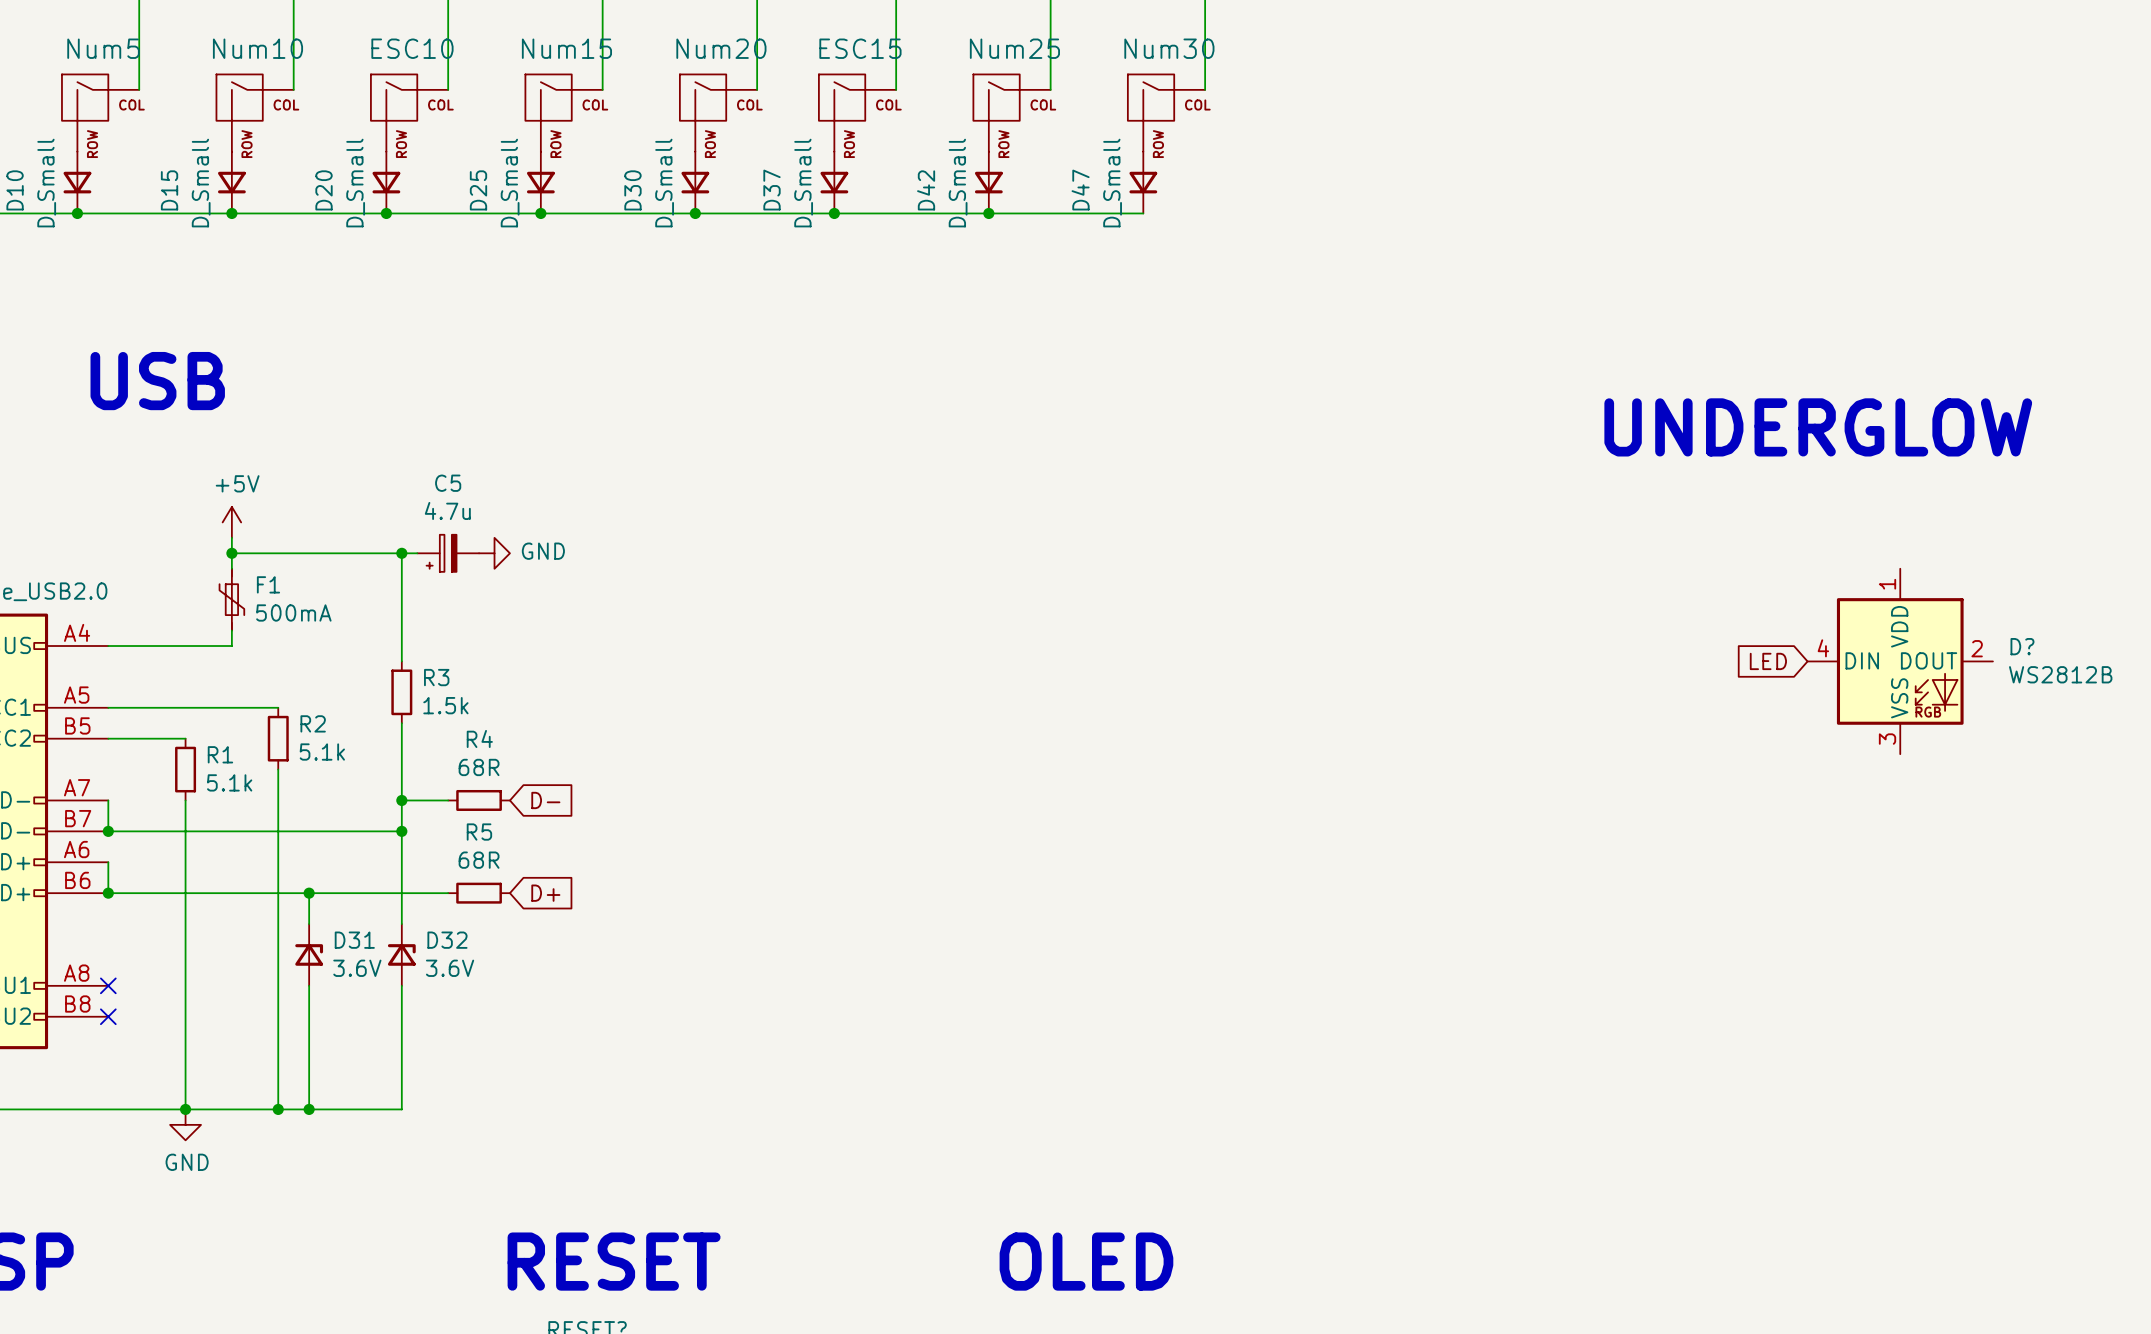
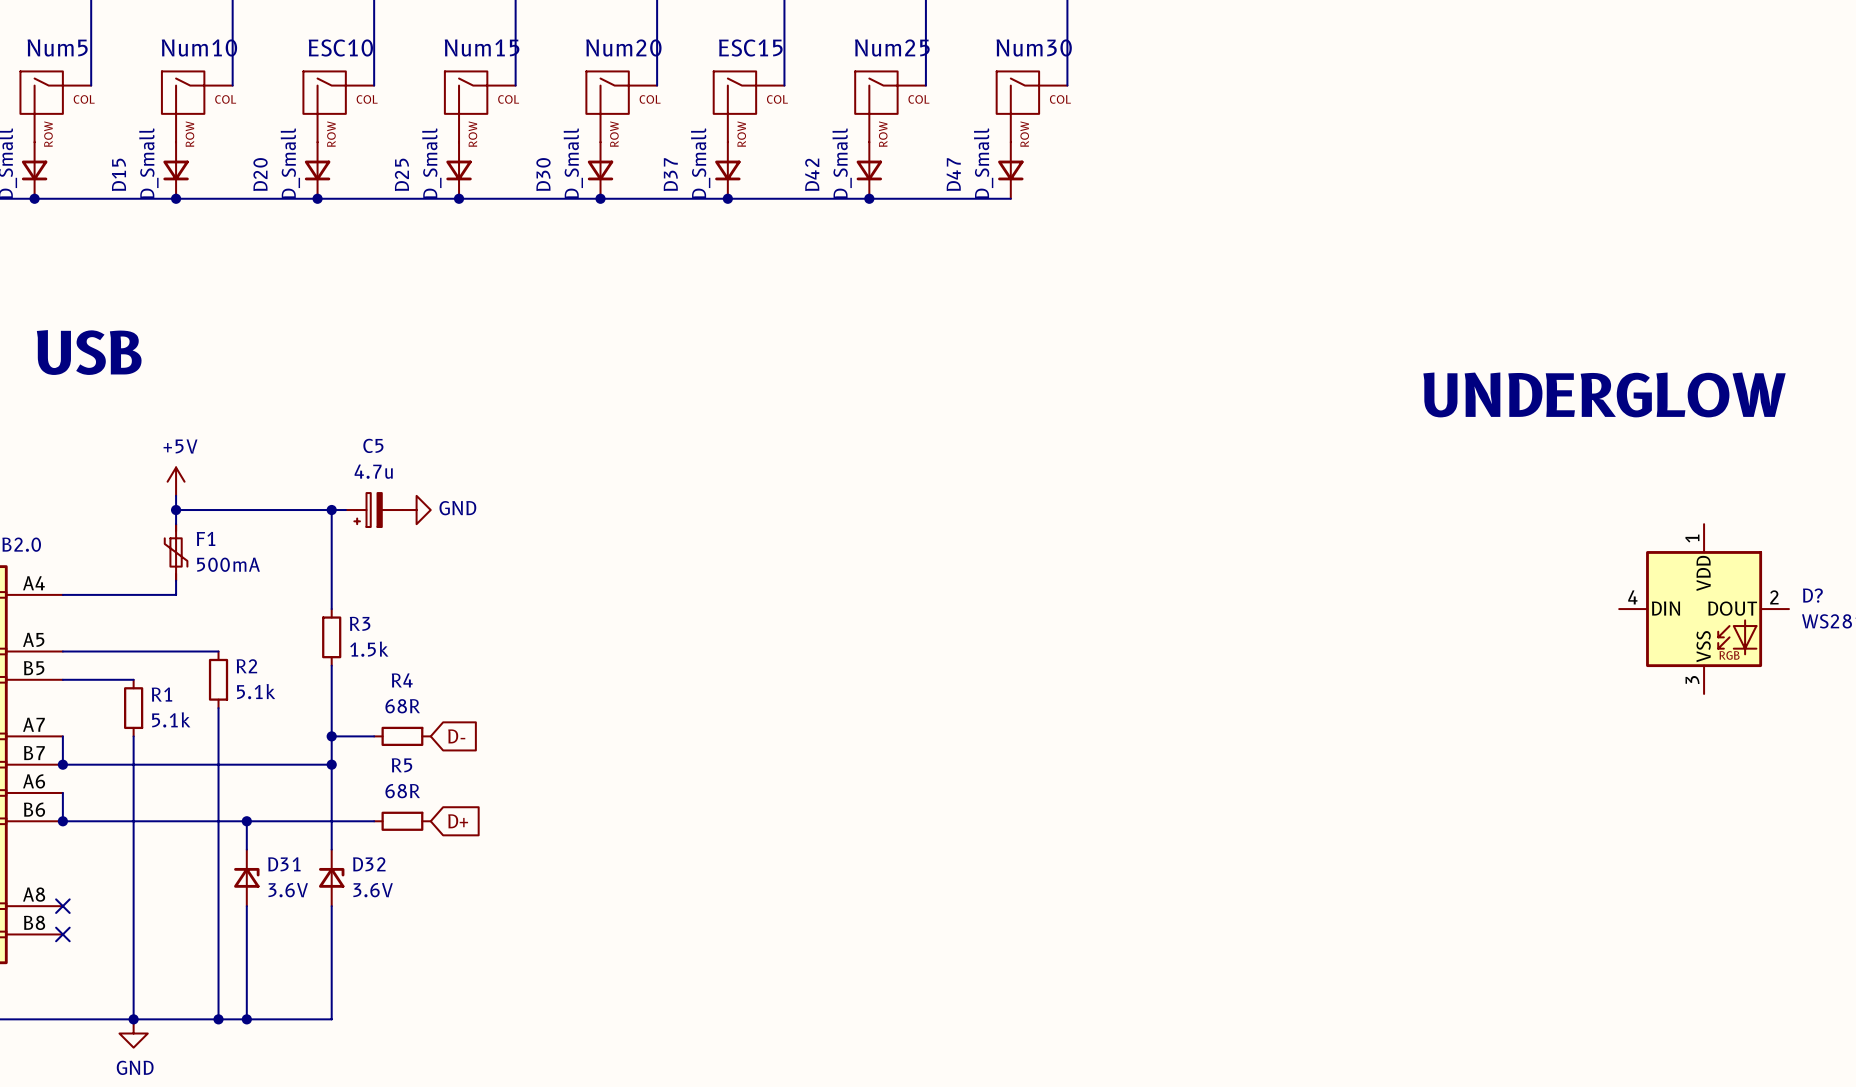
global label: LED (1768, 661) -> none

